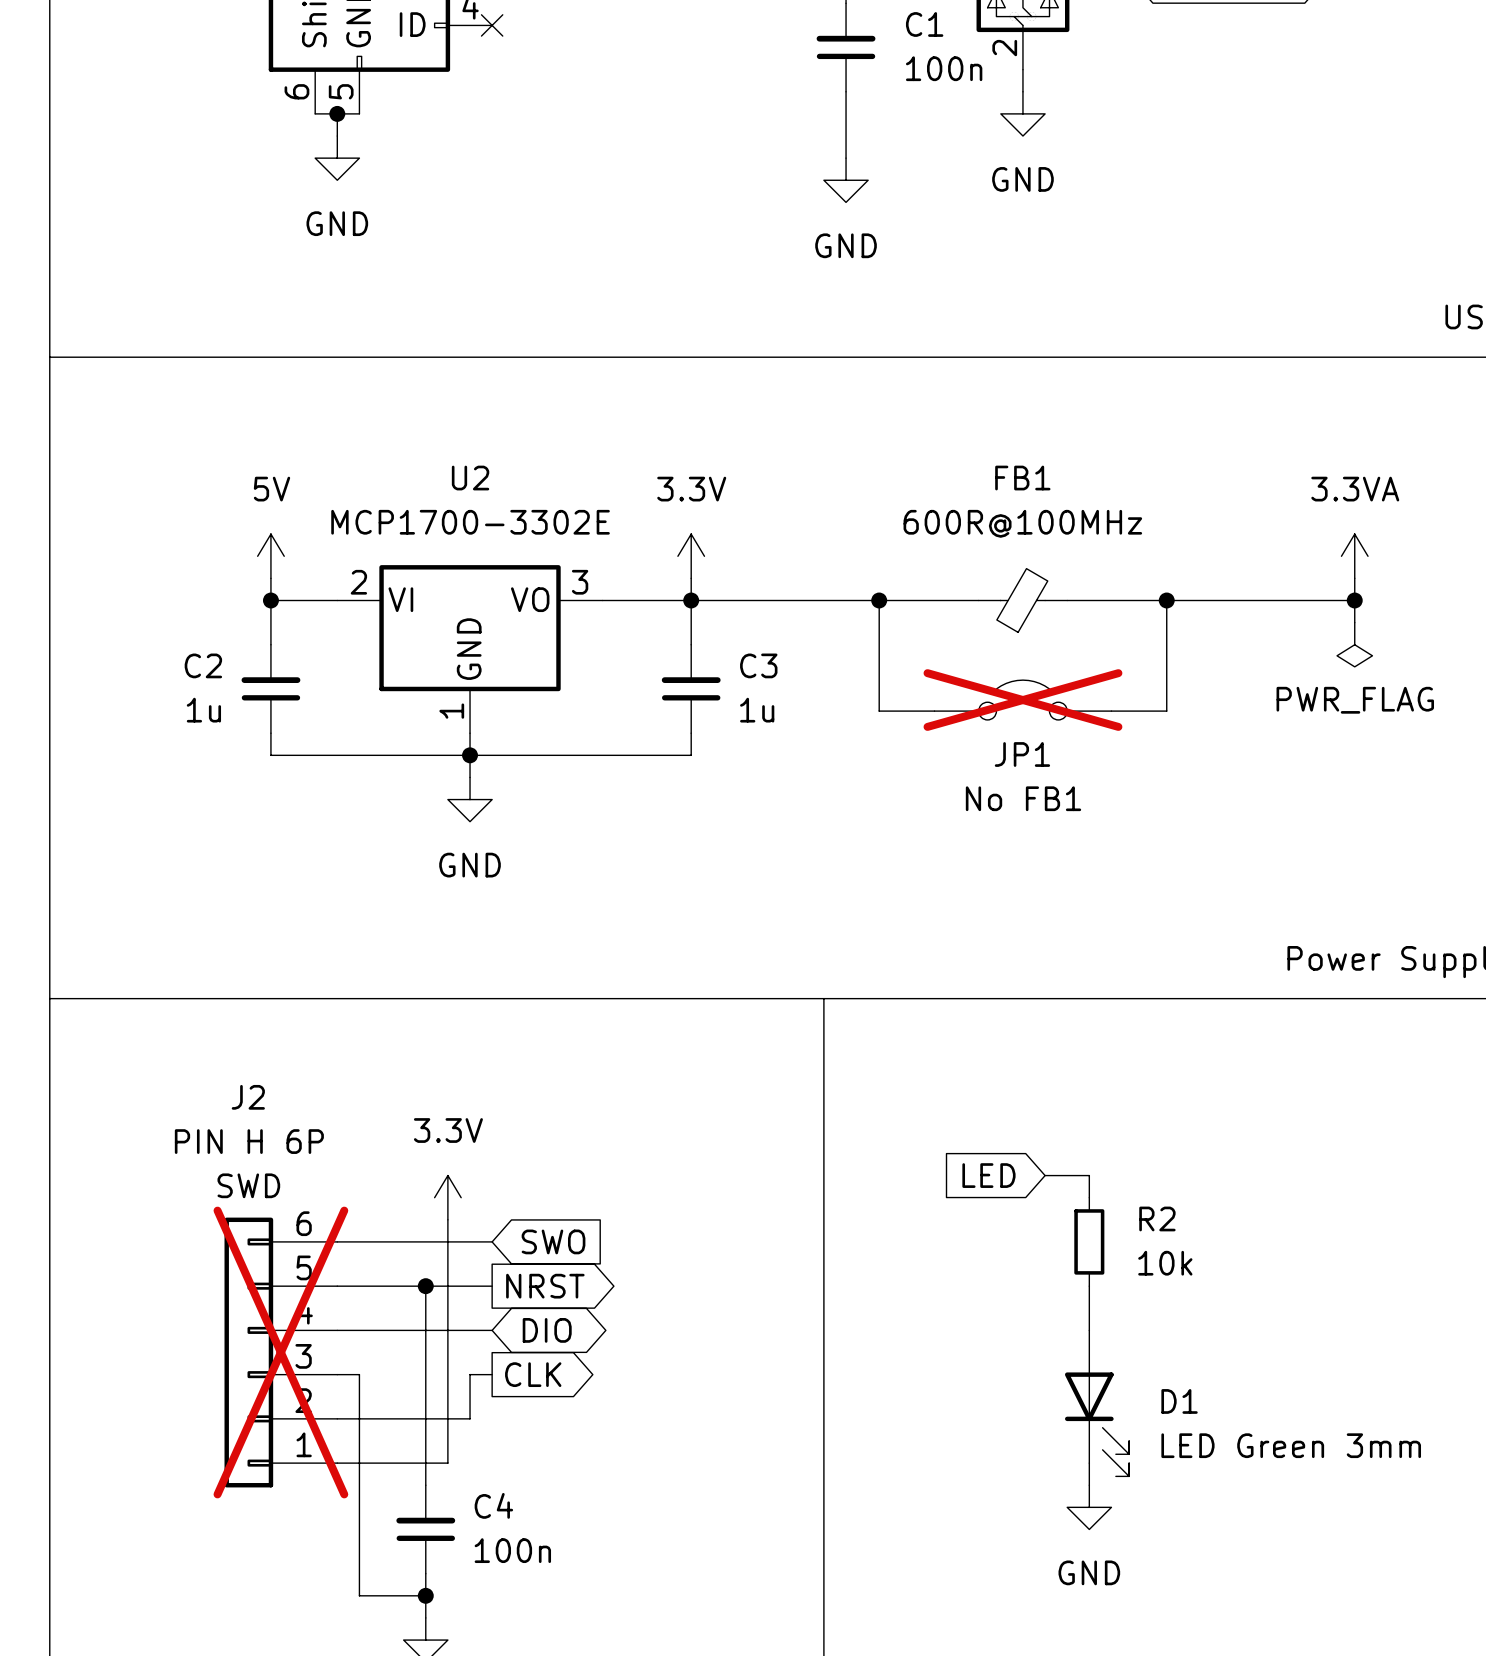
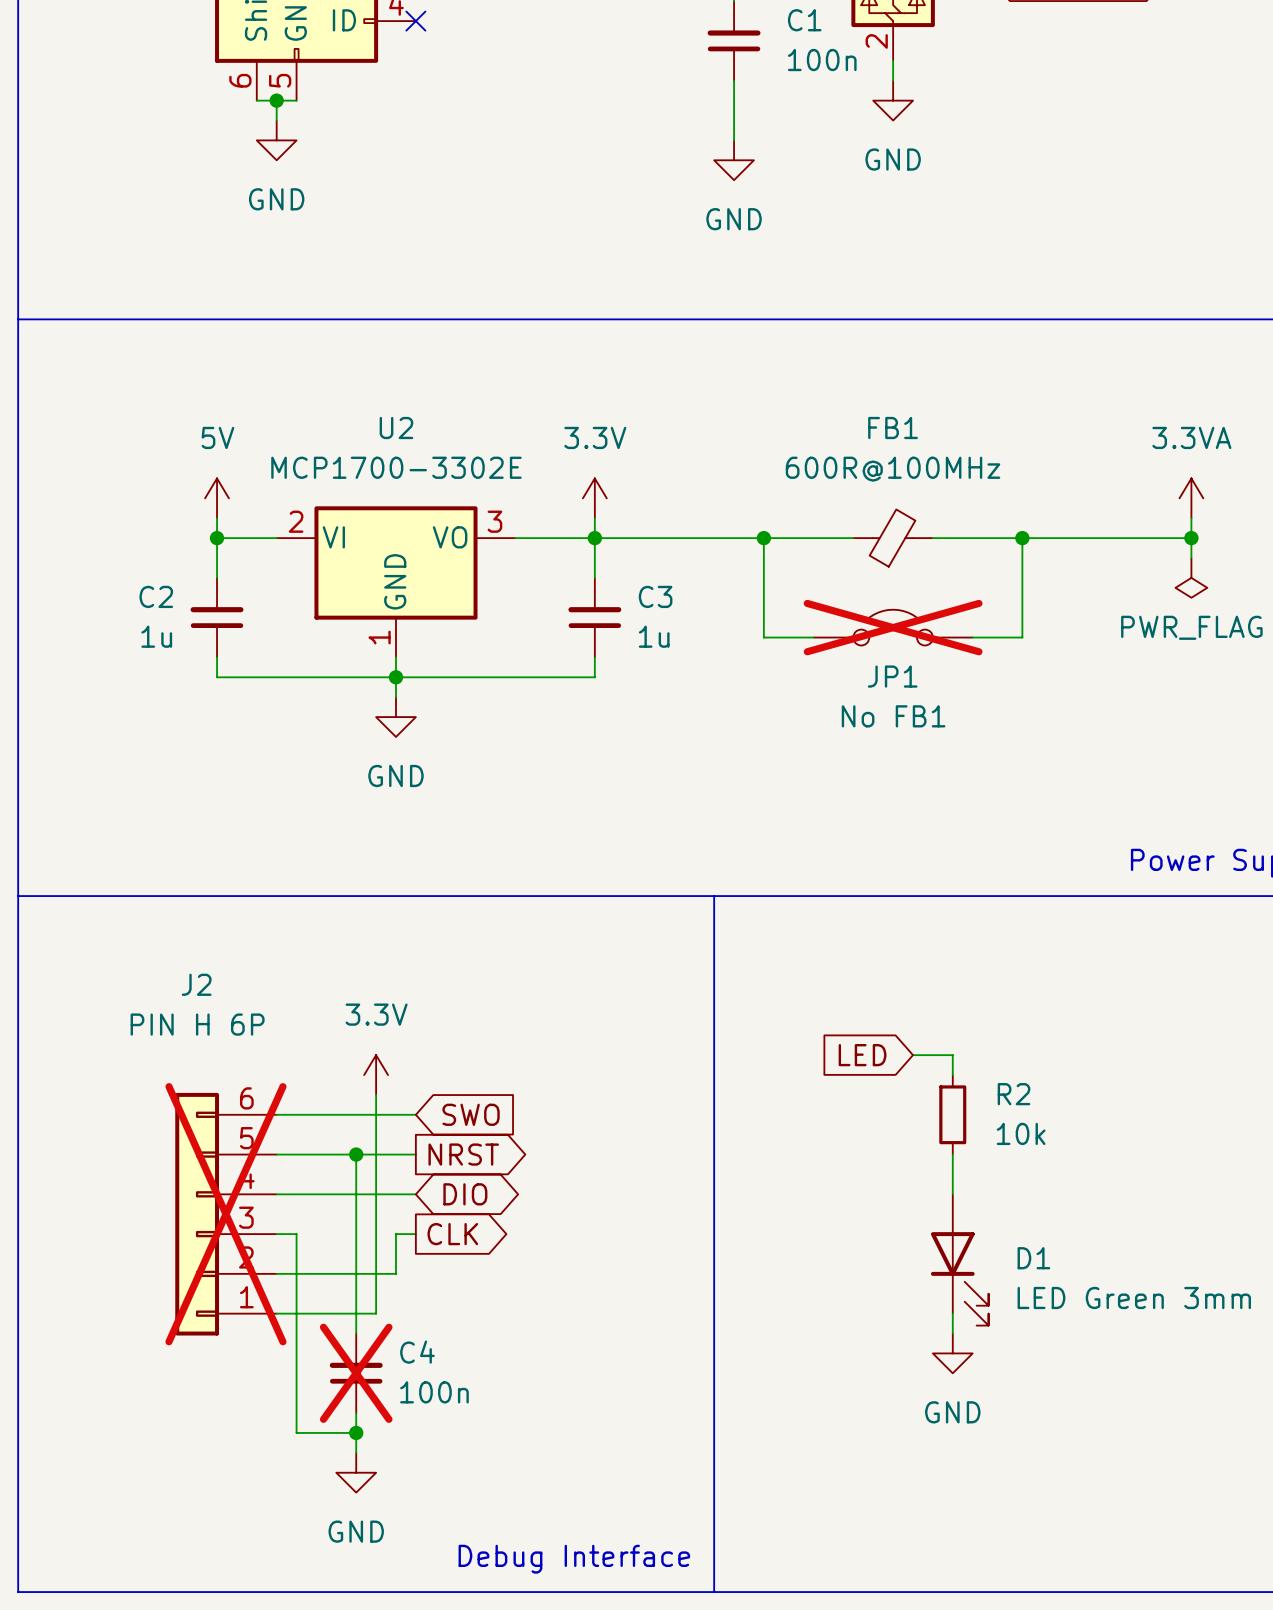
J2 text: SWD (248, 1185) -> none
C4 do-not-place cross: none -> (356, 1373)

